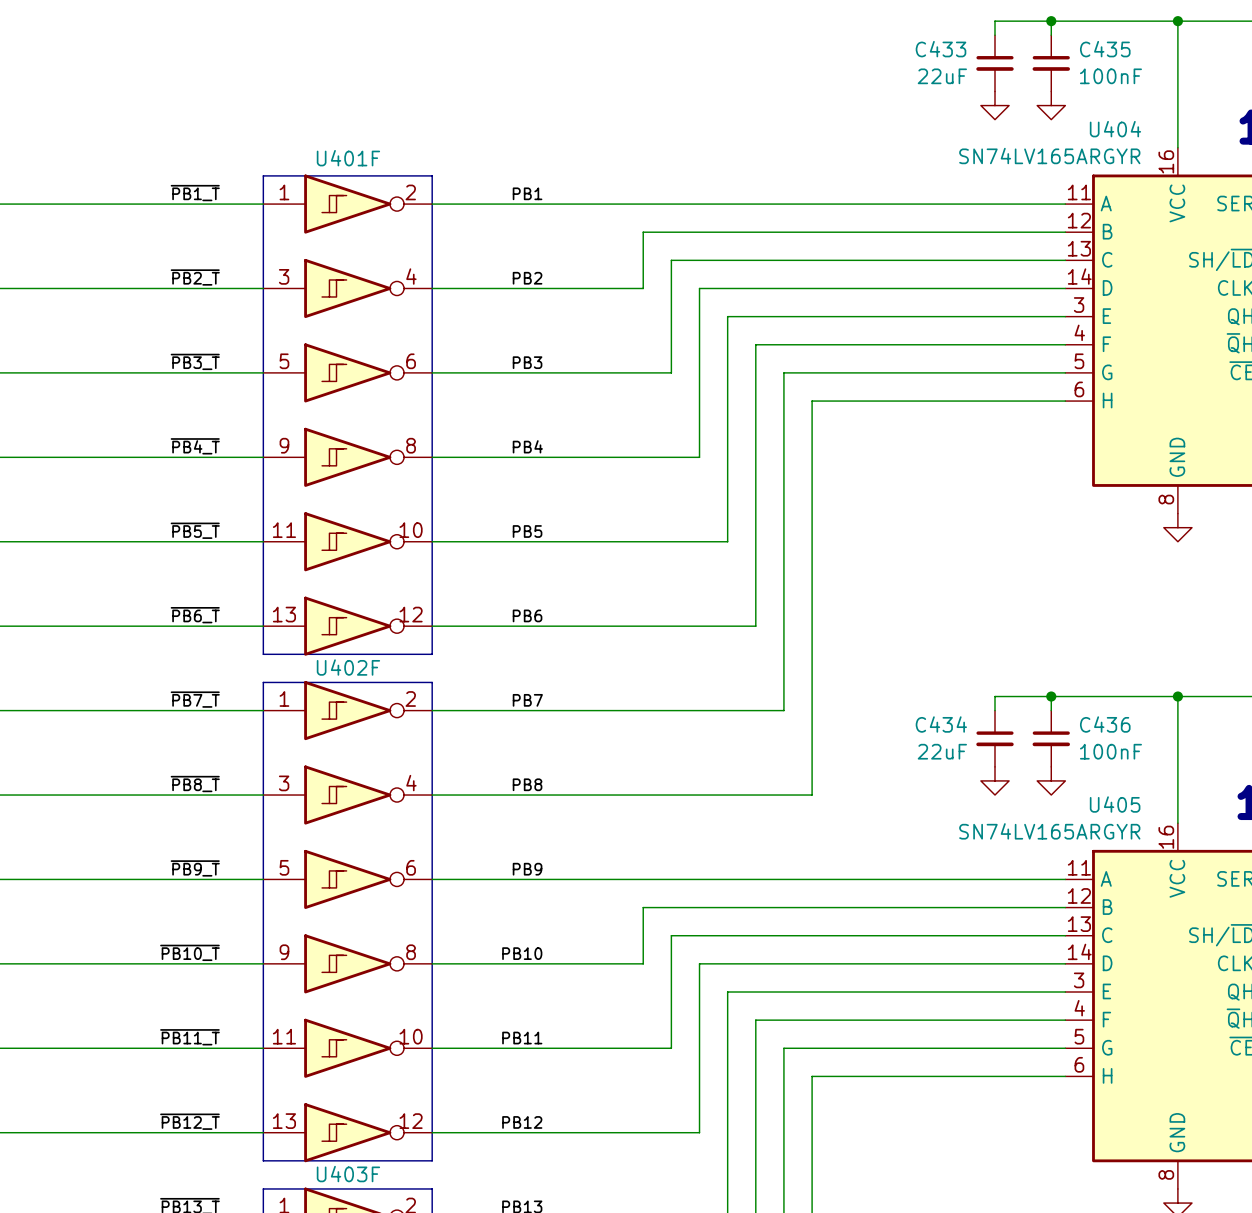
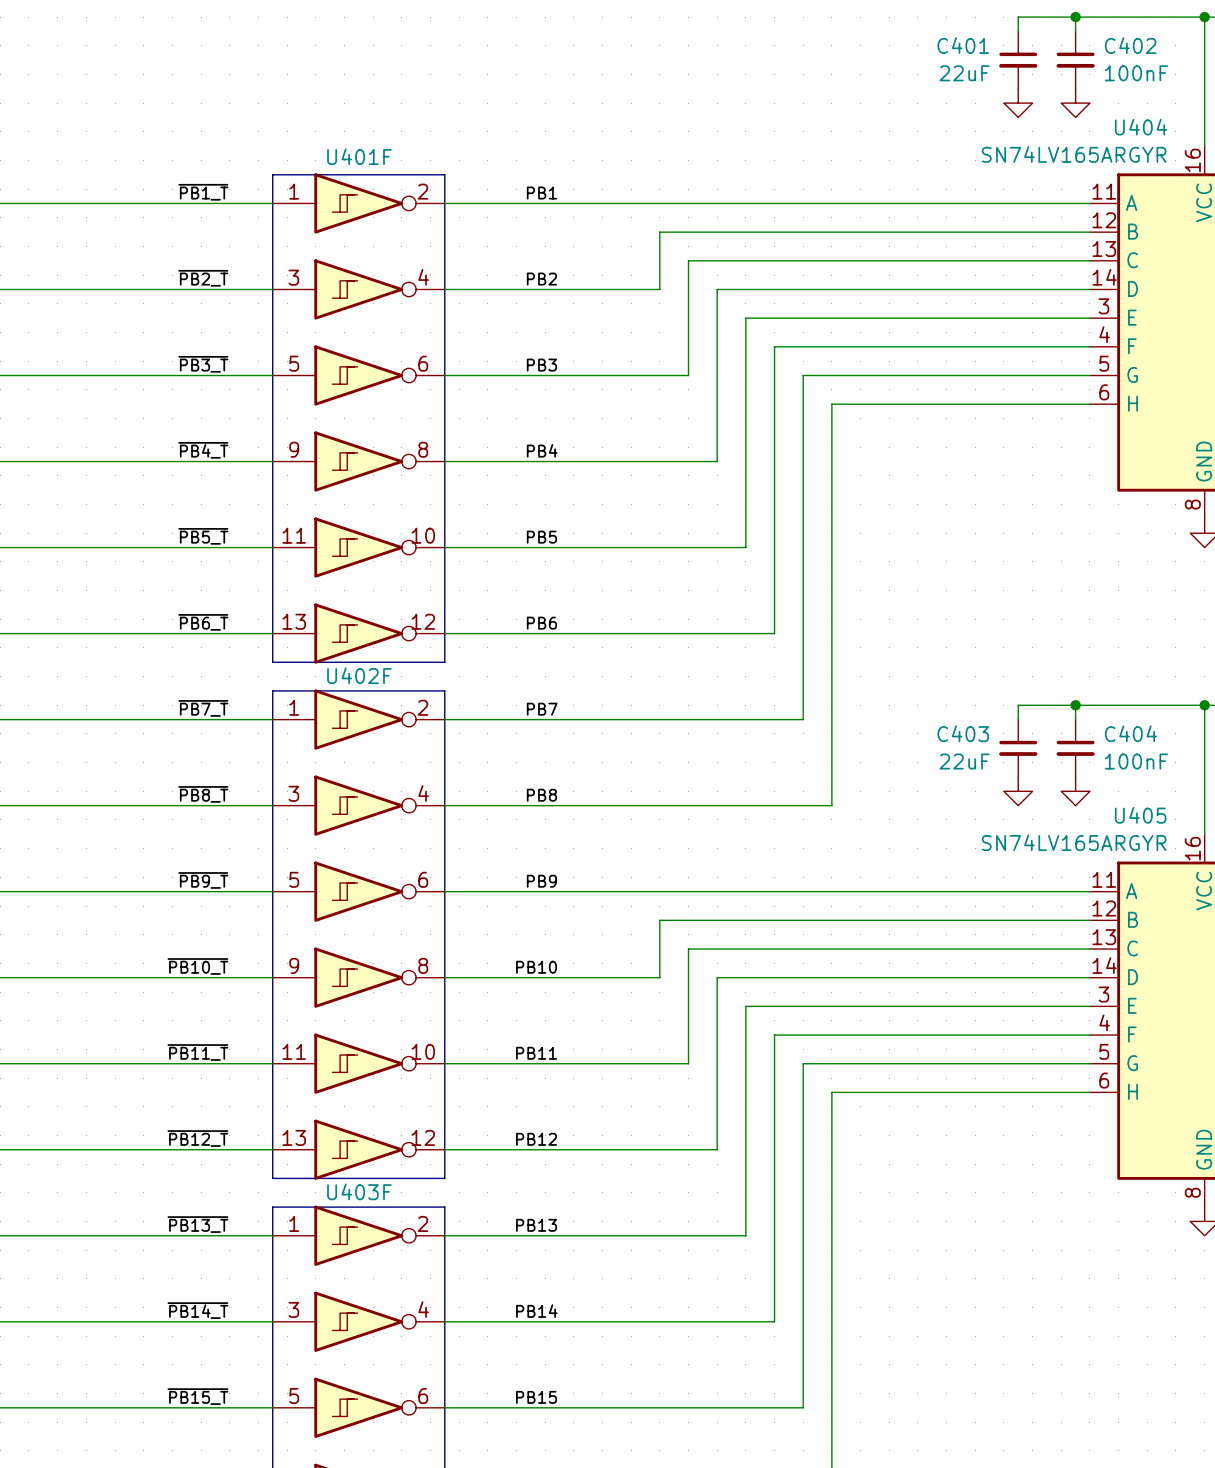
C433 name: C433 (941, 49) -> C401 (963, 45)
C435 name: C435 (1105, 49) -> C402 (1130, 45)
C434 name: C434 (941, 724) -> C403 (963, 733)
C436 name: C436 (1105, 724) -> C404 (1130, 733)

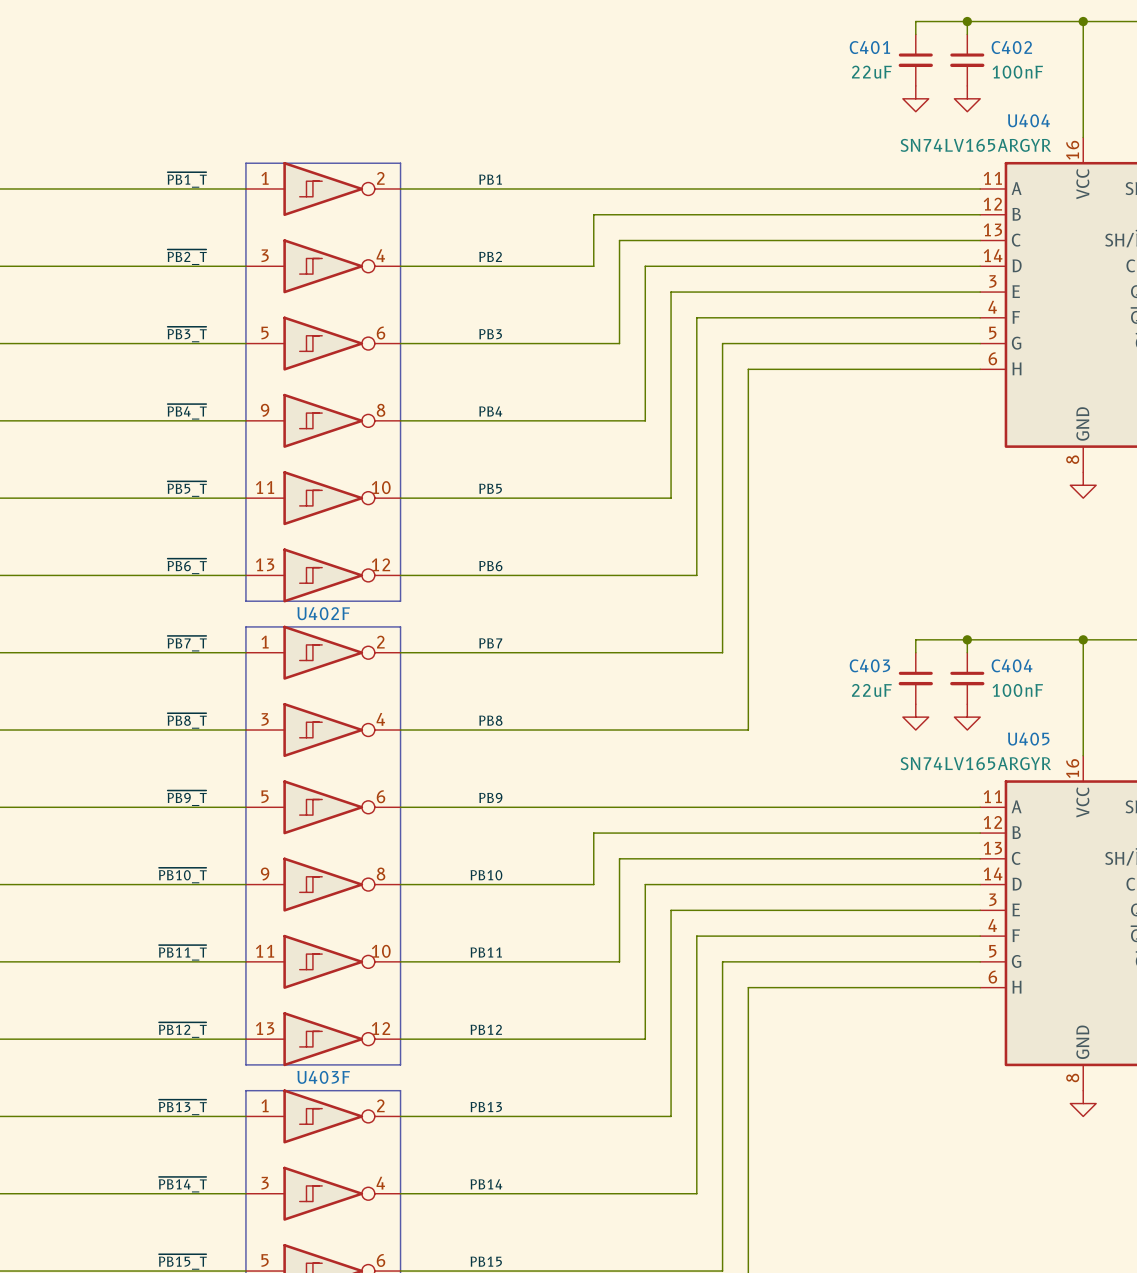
U401F name: U401F (359, 156) -> none

